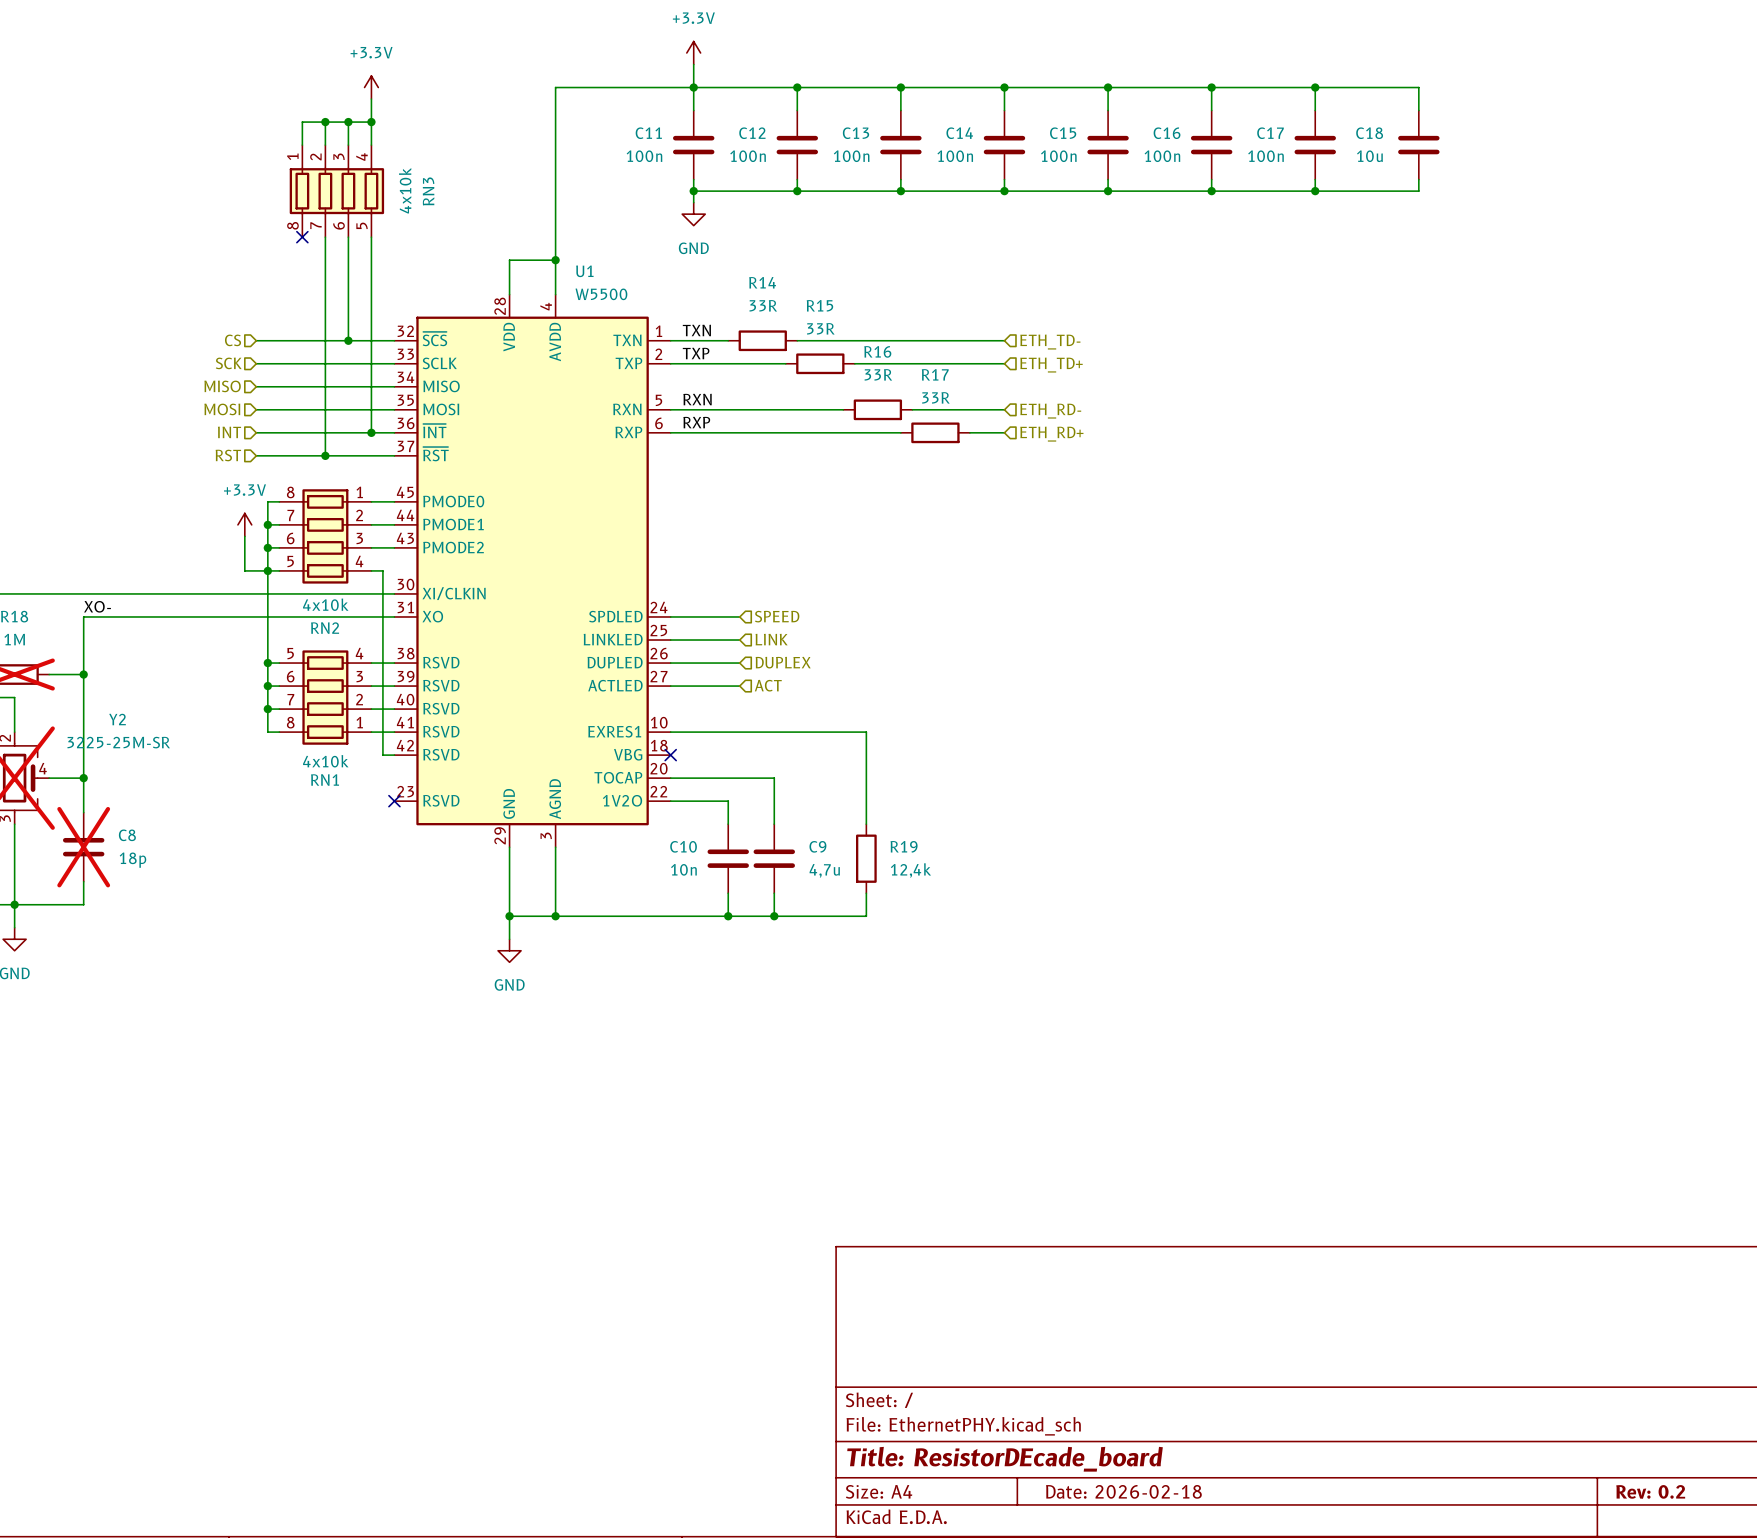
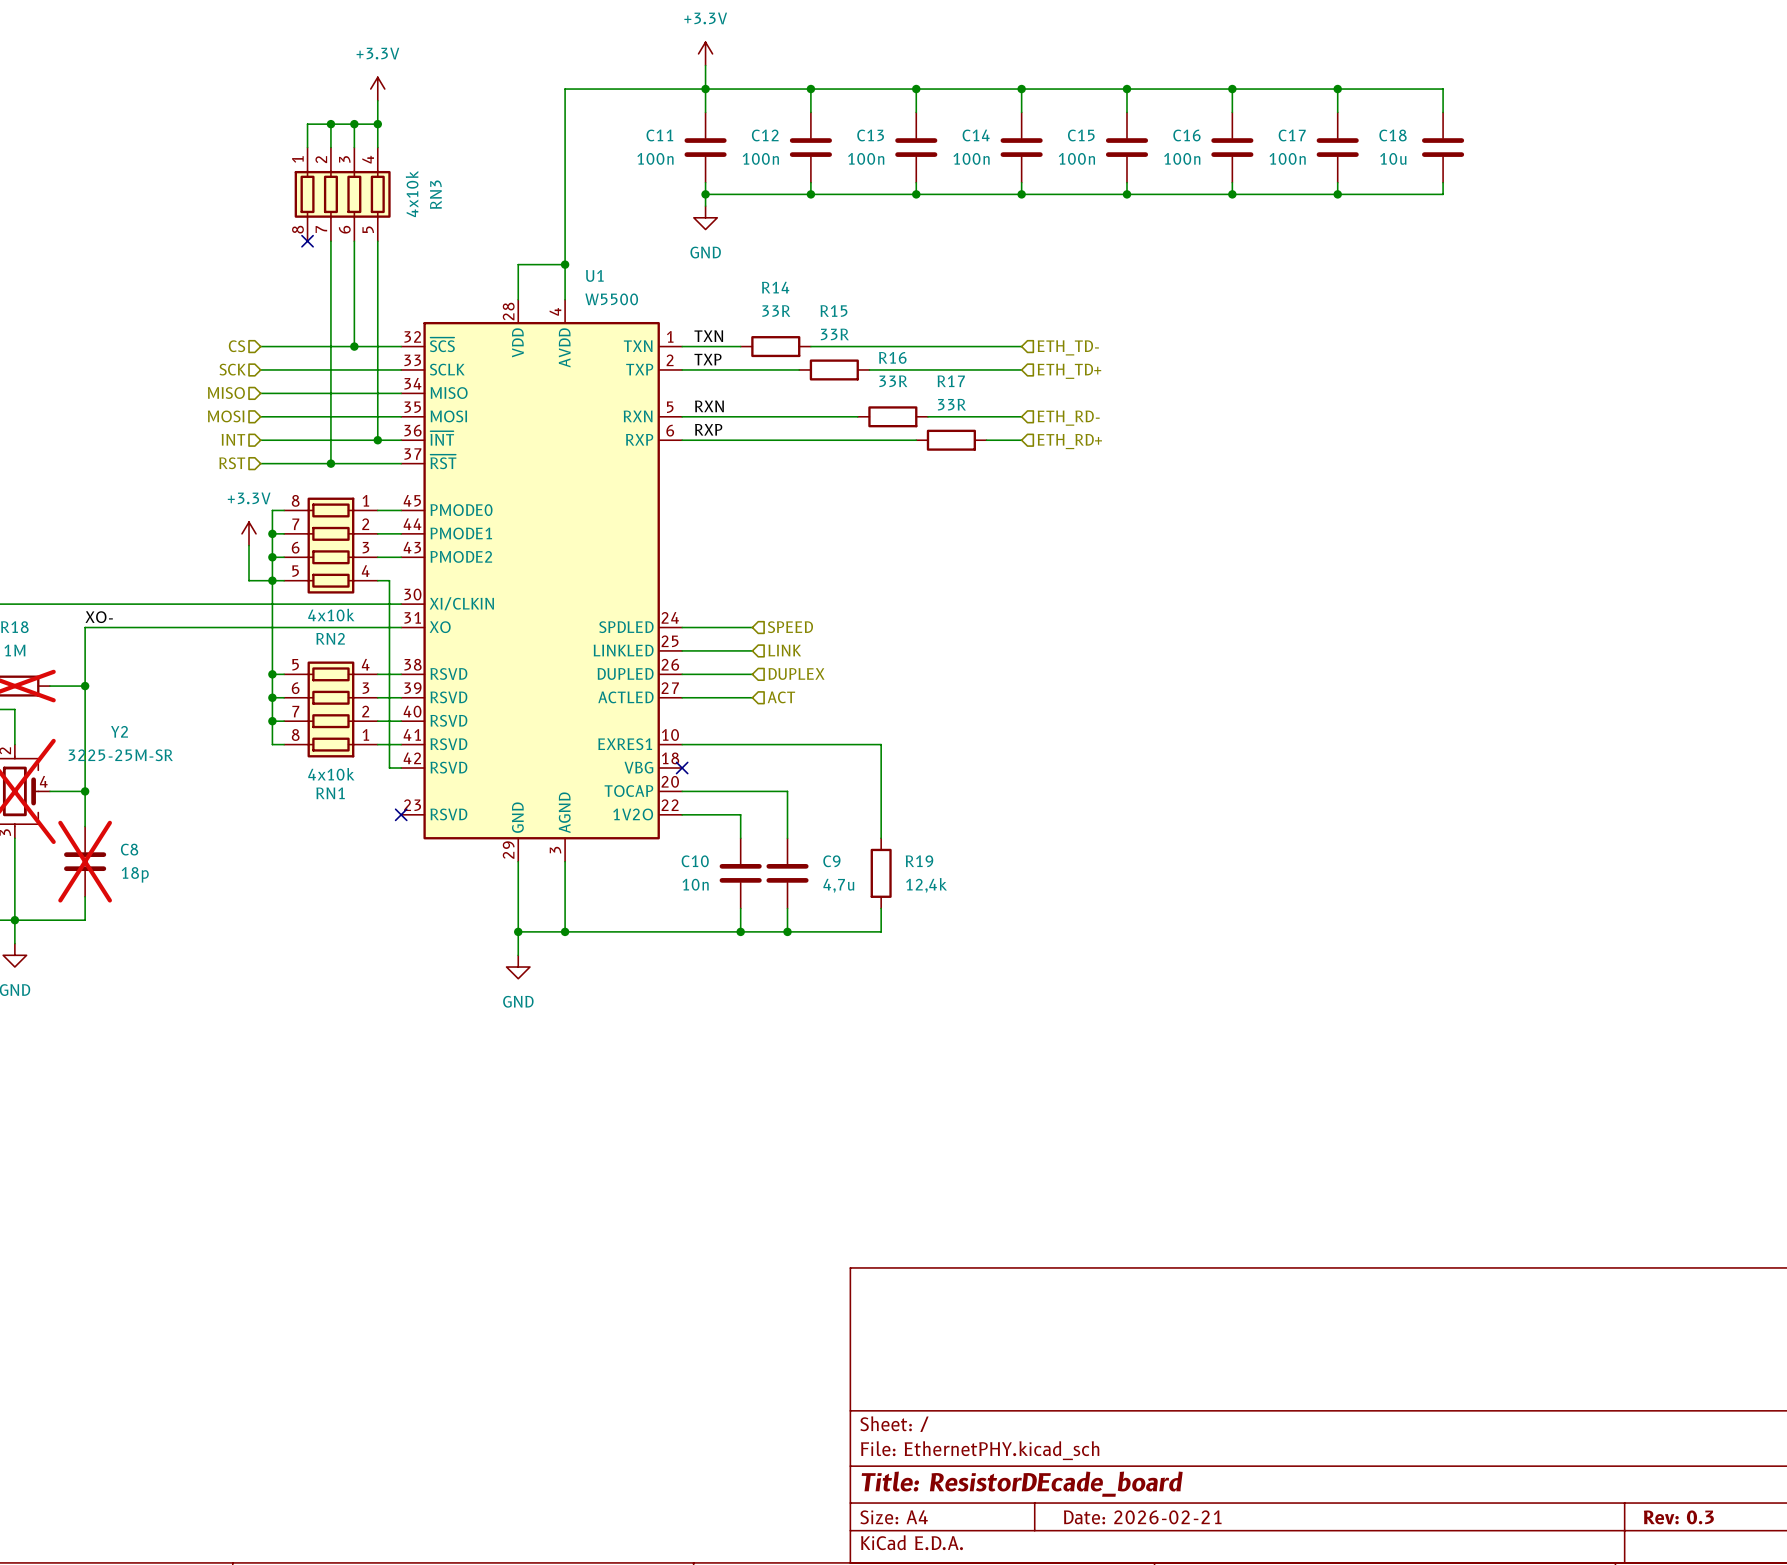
title block: Date: 2026-02-18 (1123, 1491) -> Date: 2026-02-21 (1142, 1517)
title block: Rev: 0.2 (1650, 1491) -> Rev: 0.3 (1678, 1517)

